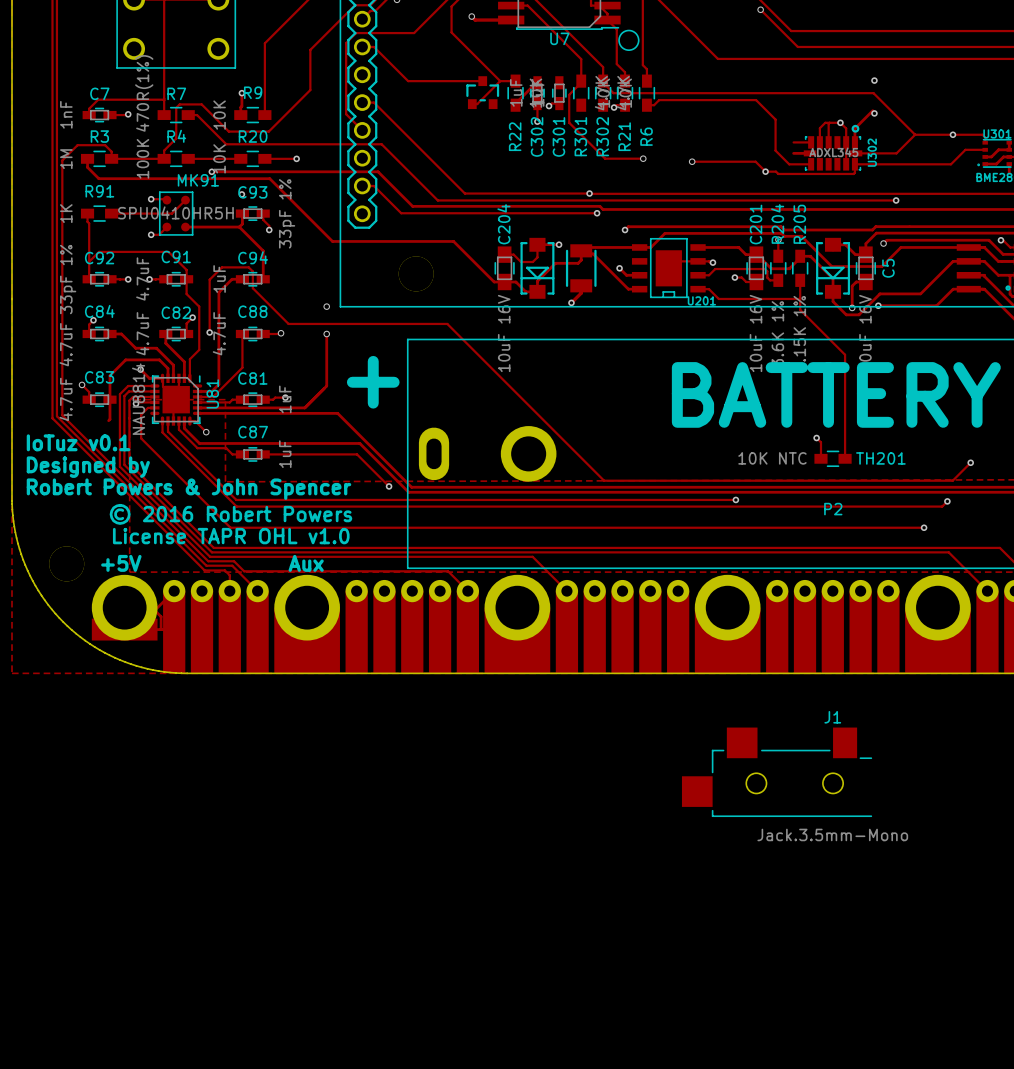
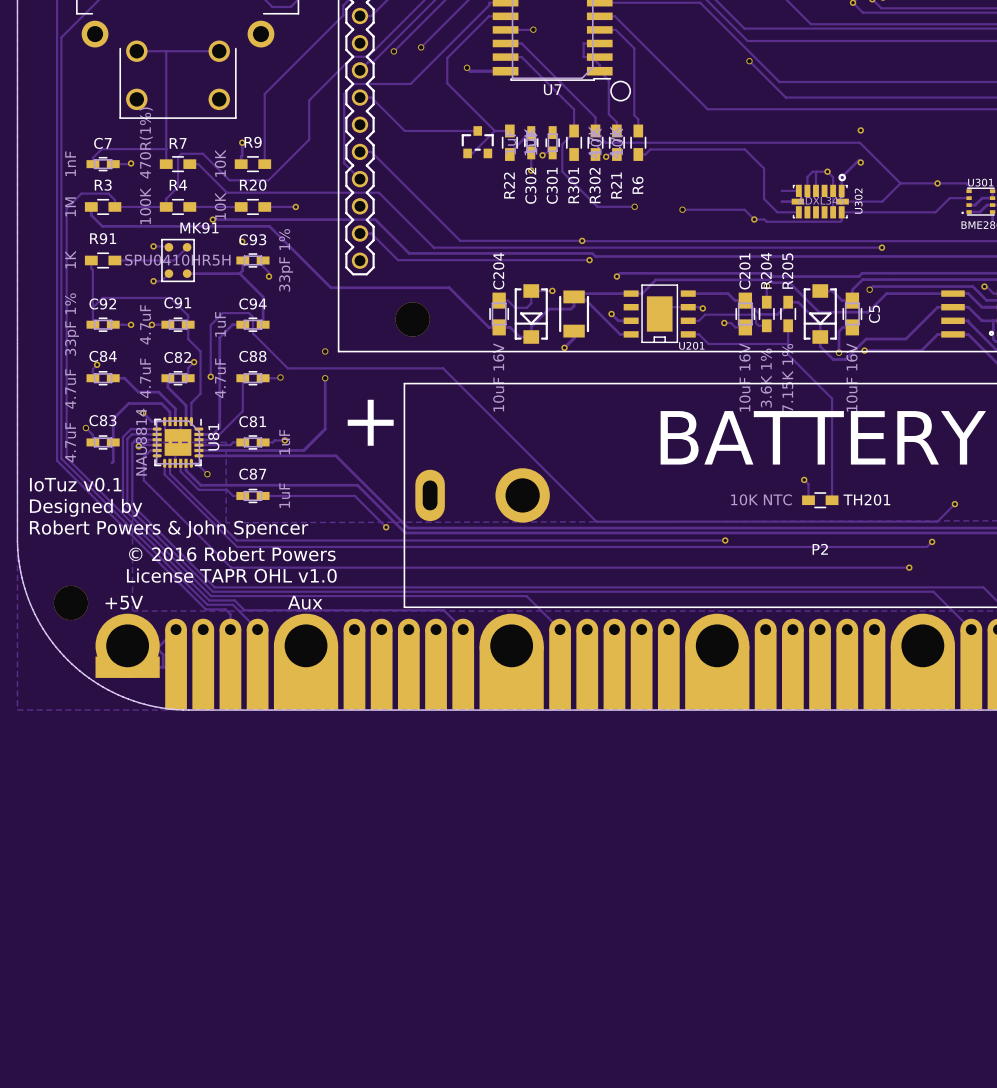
J1: Jack.3.5mm-Mono (777, 772) -> none

